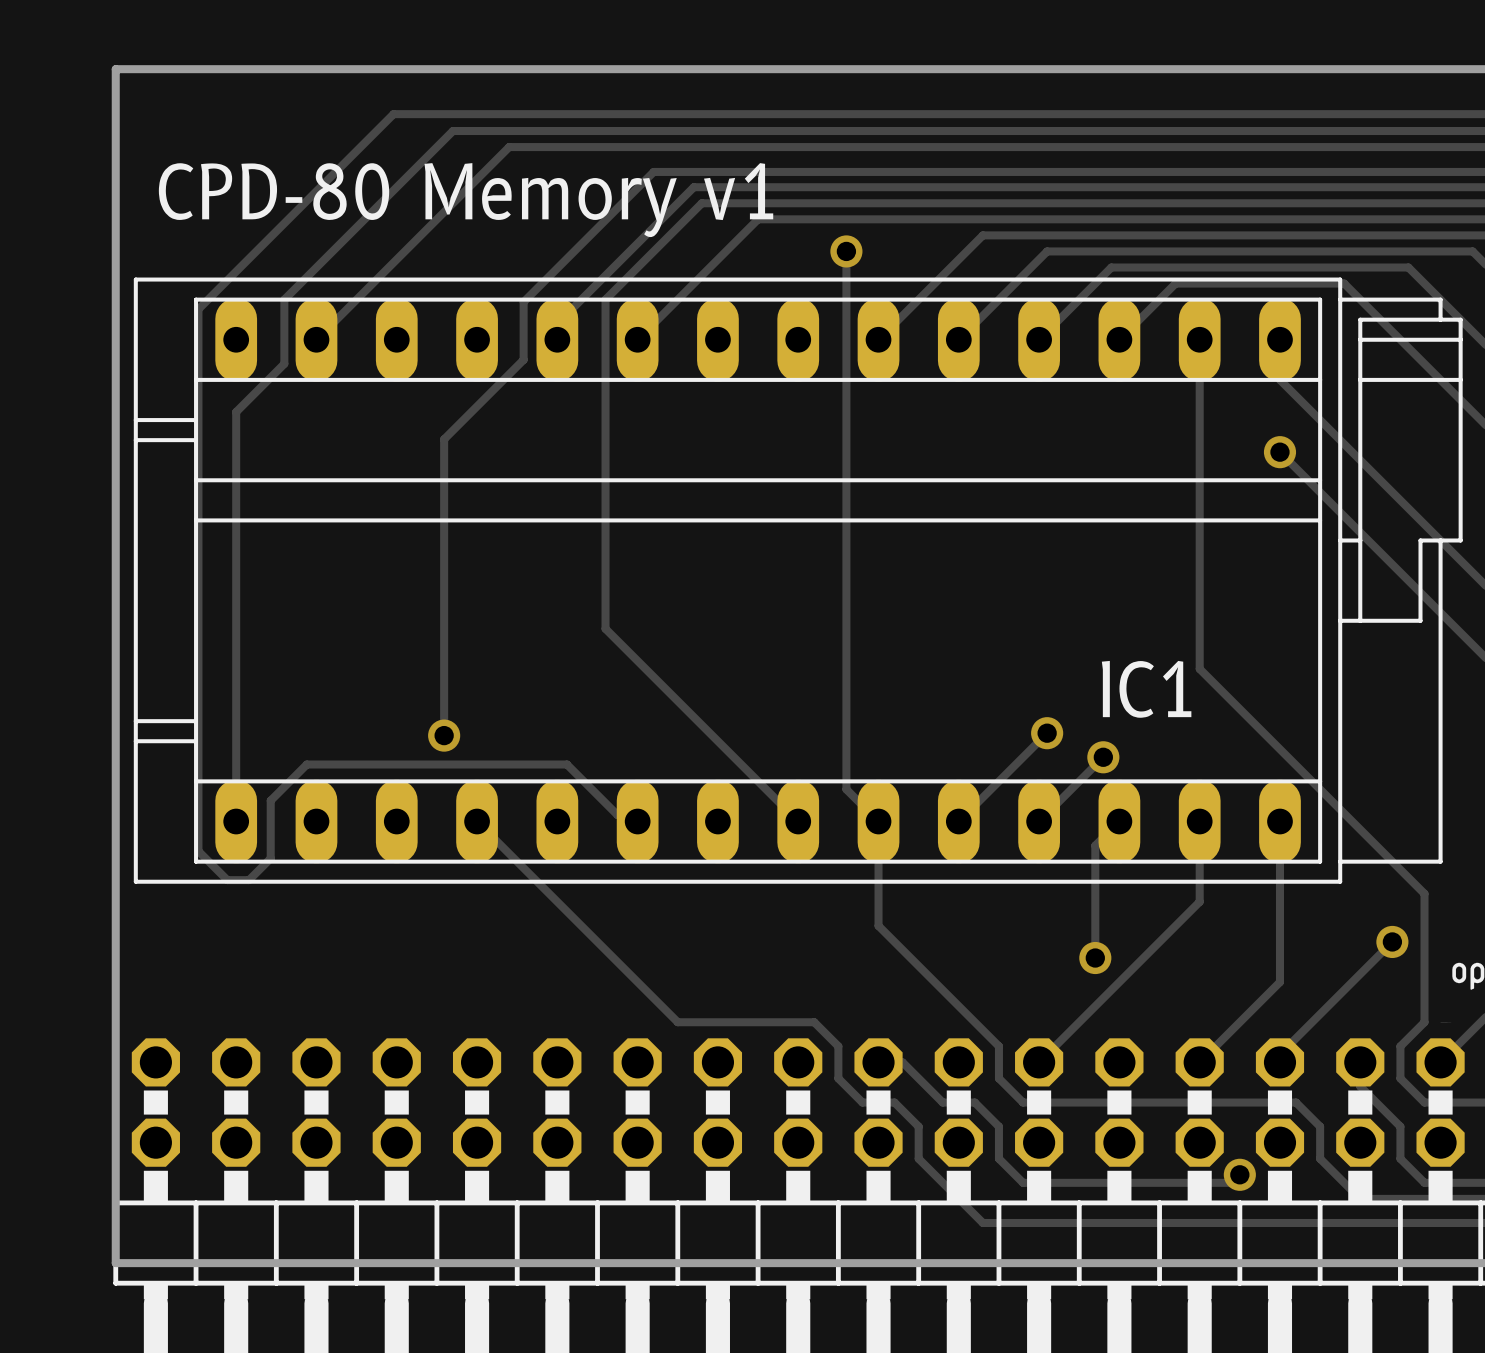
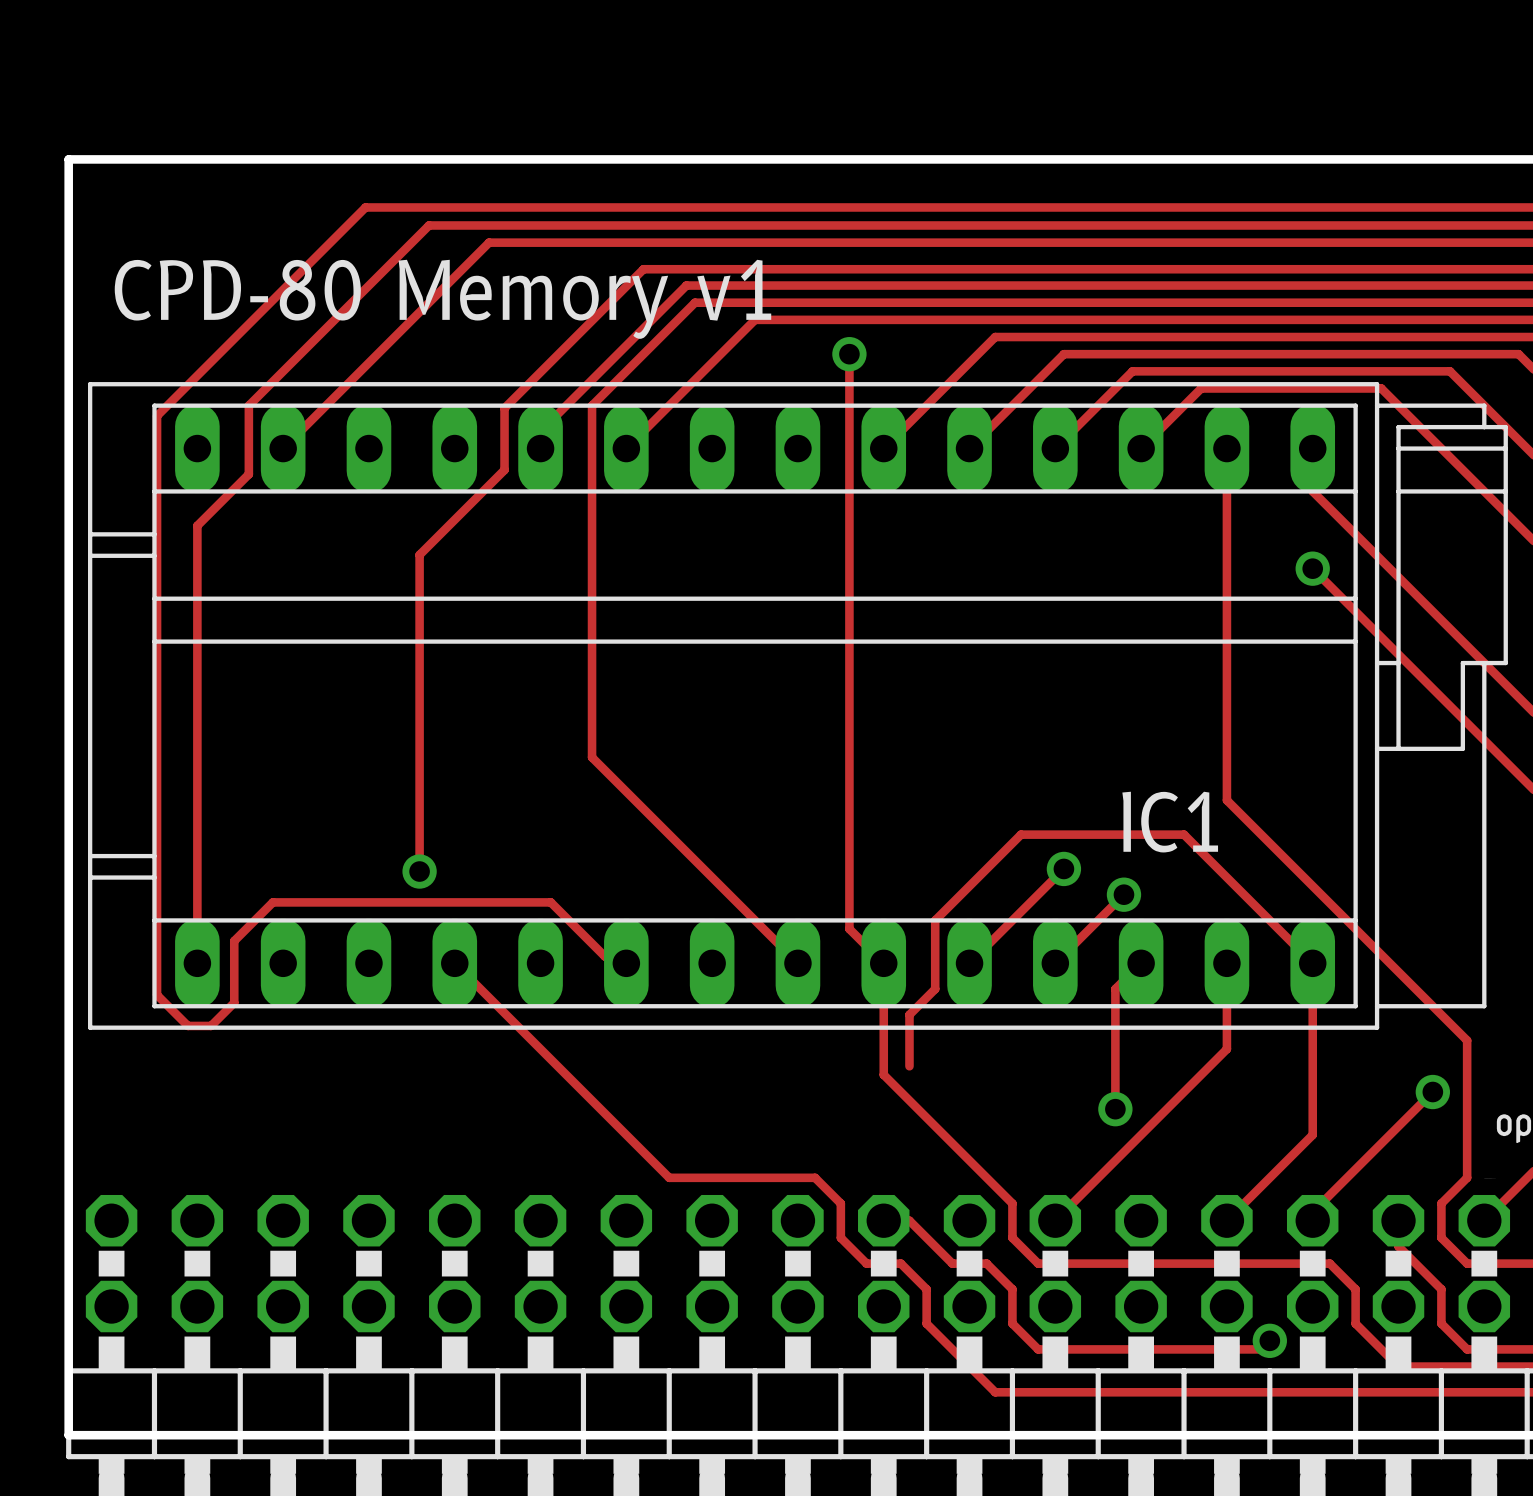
track: none -> (1312, 963) (1184, 834) (1021, 834) (935, 920) (935, 989) (909, 1014) (909, 1066)

